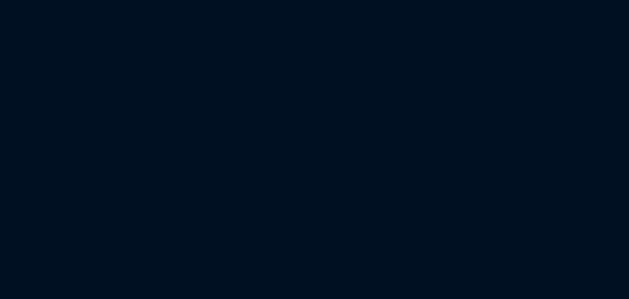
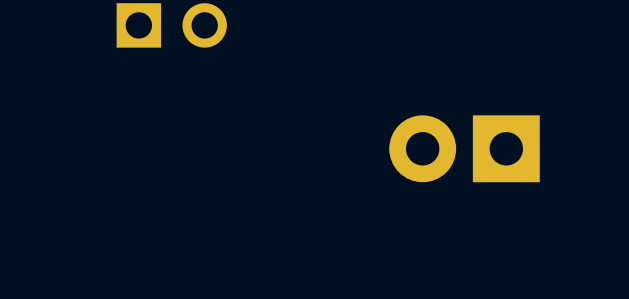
part: none -> (171, 25)
part: none -> (464, 148)

